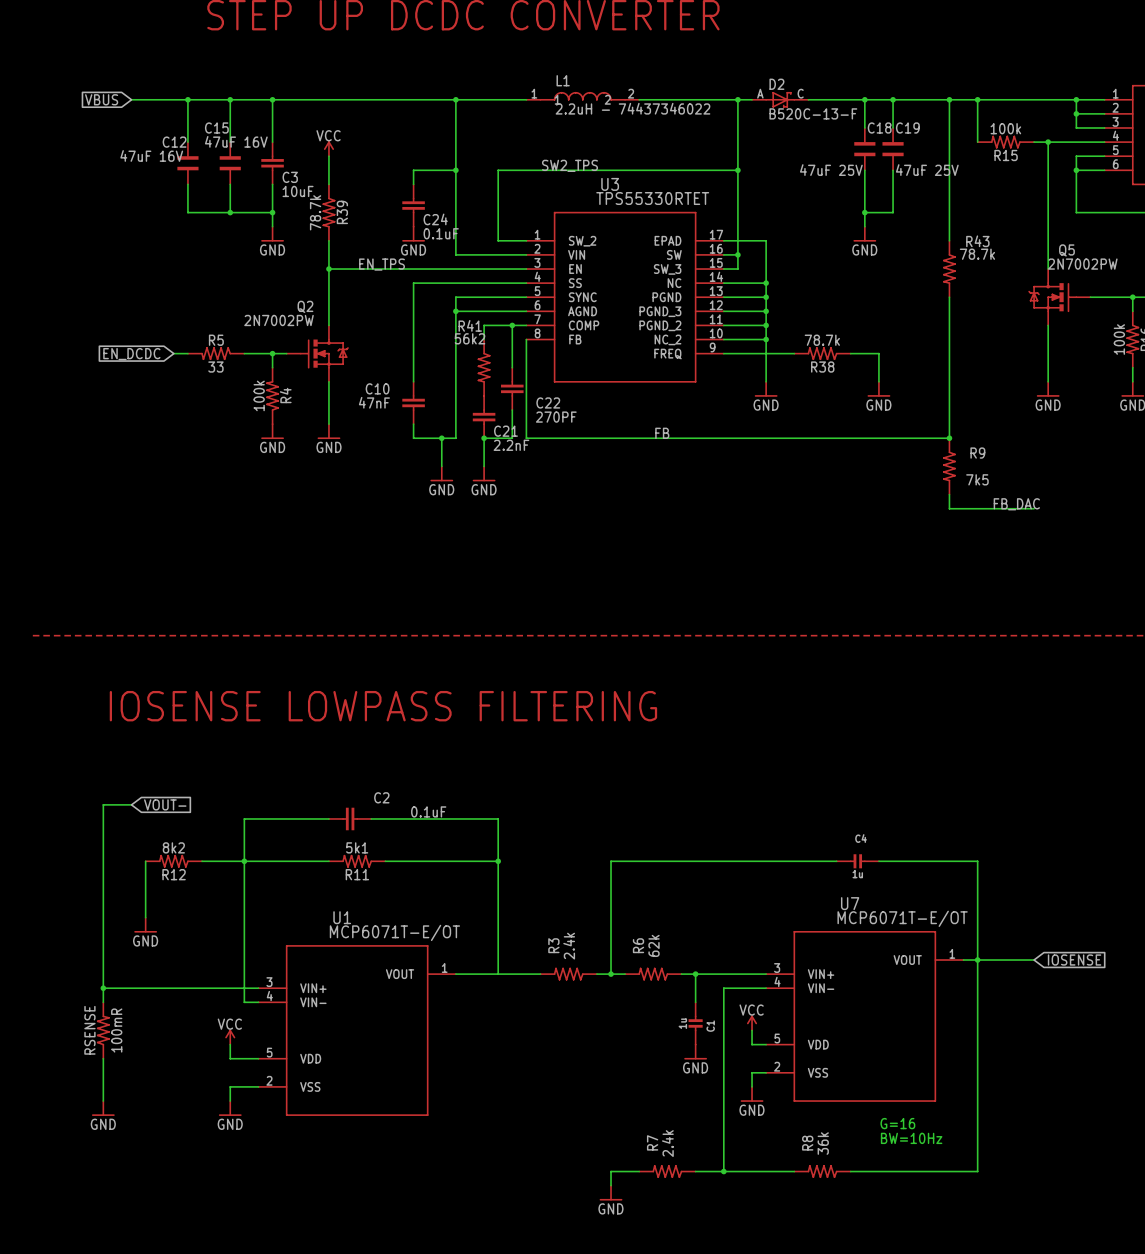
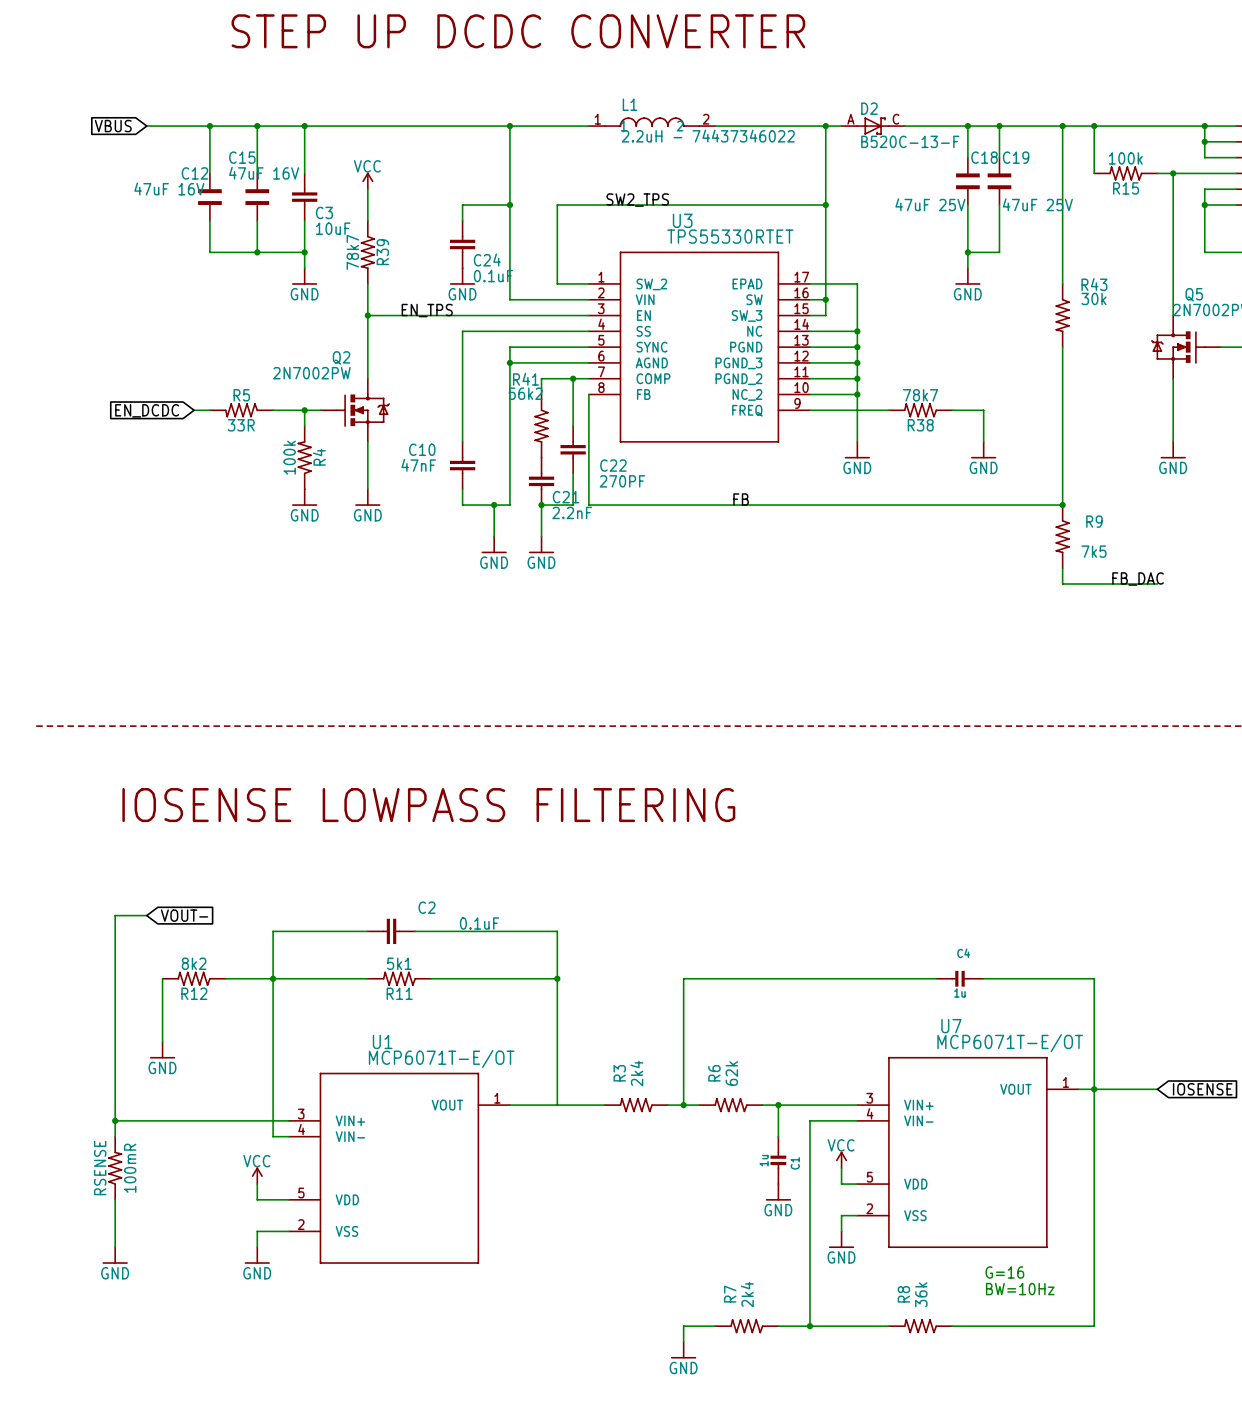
R39 value: 78.7k (315, 212) -> 78k7 (352, 252)
R43 value: 78.7k (977, 254) -> 30k (1093, 298)
R38 value: 78.7k (822, 340) -> 78k7 (920, 395)
R5 value: 33 (215, 367) -> 33R (241, 425)
R3 value: 2.4k (569, 946) -> 2k4 (636, 1073)
R7 value: 2.4k (667, 1143) -> 2k4 (747, 1294)

